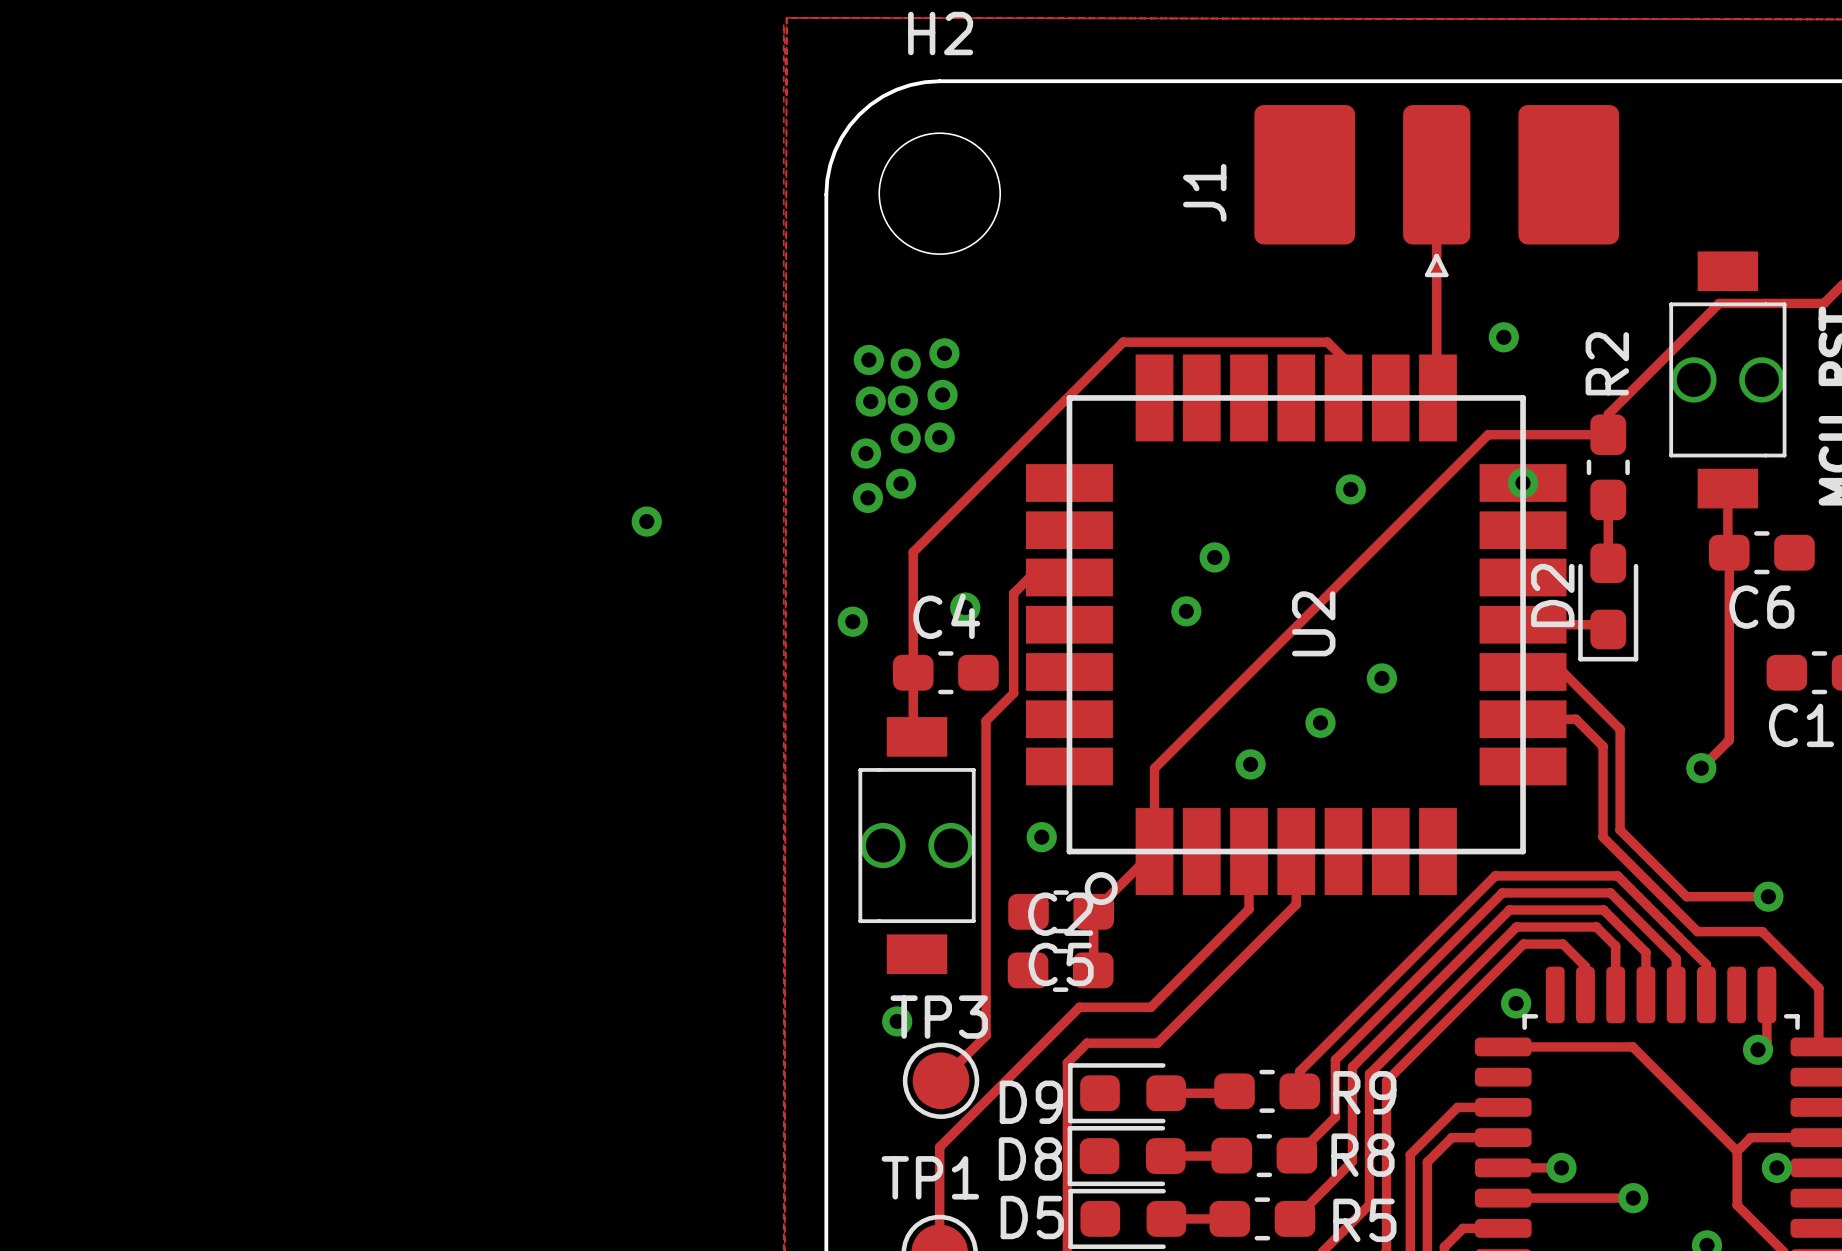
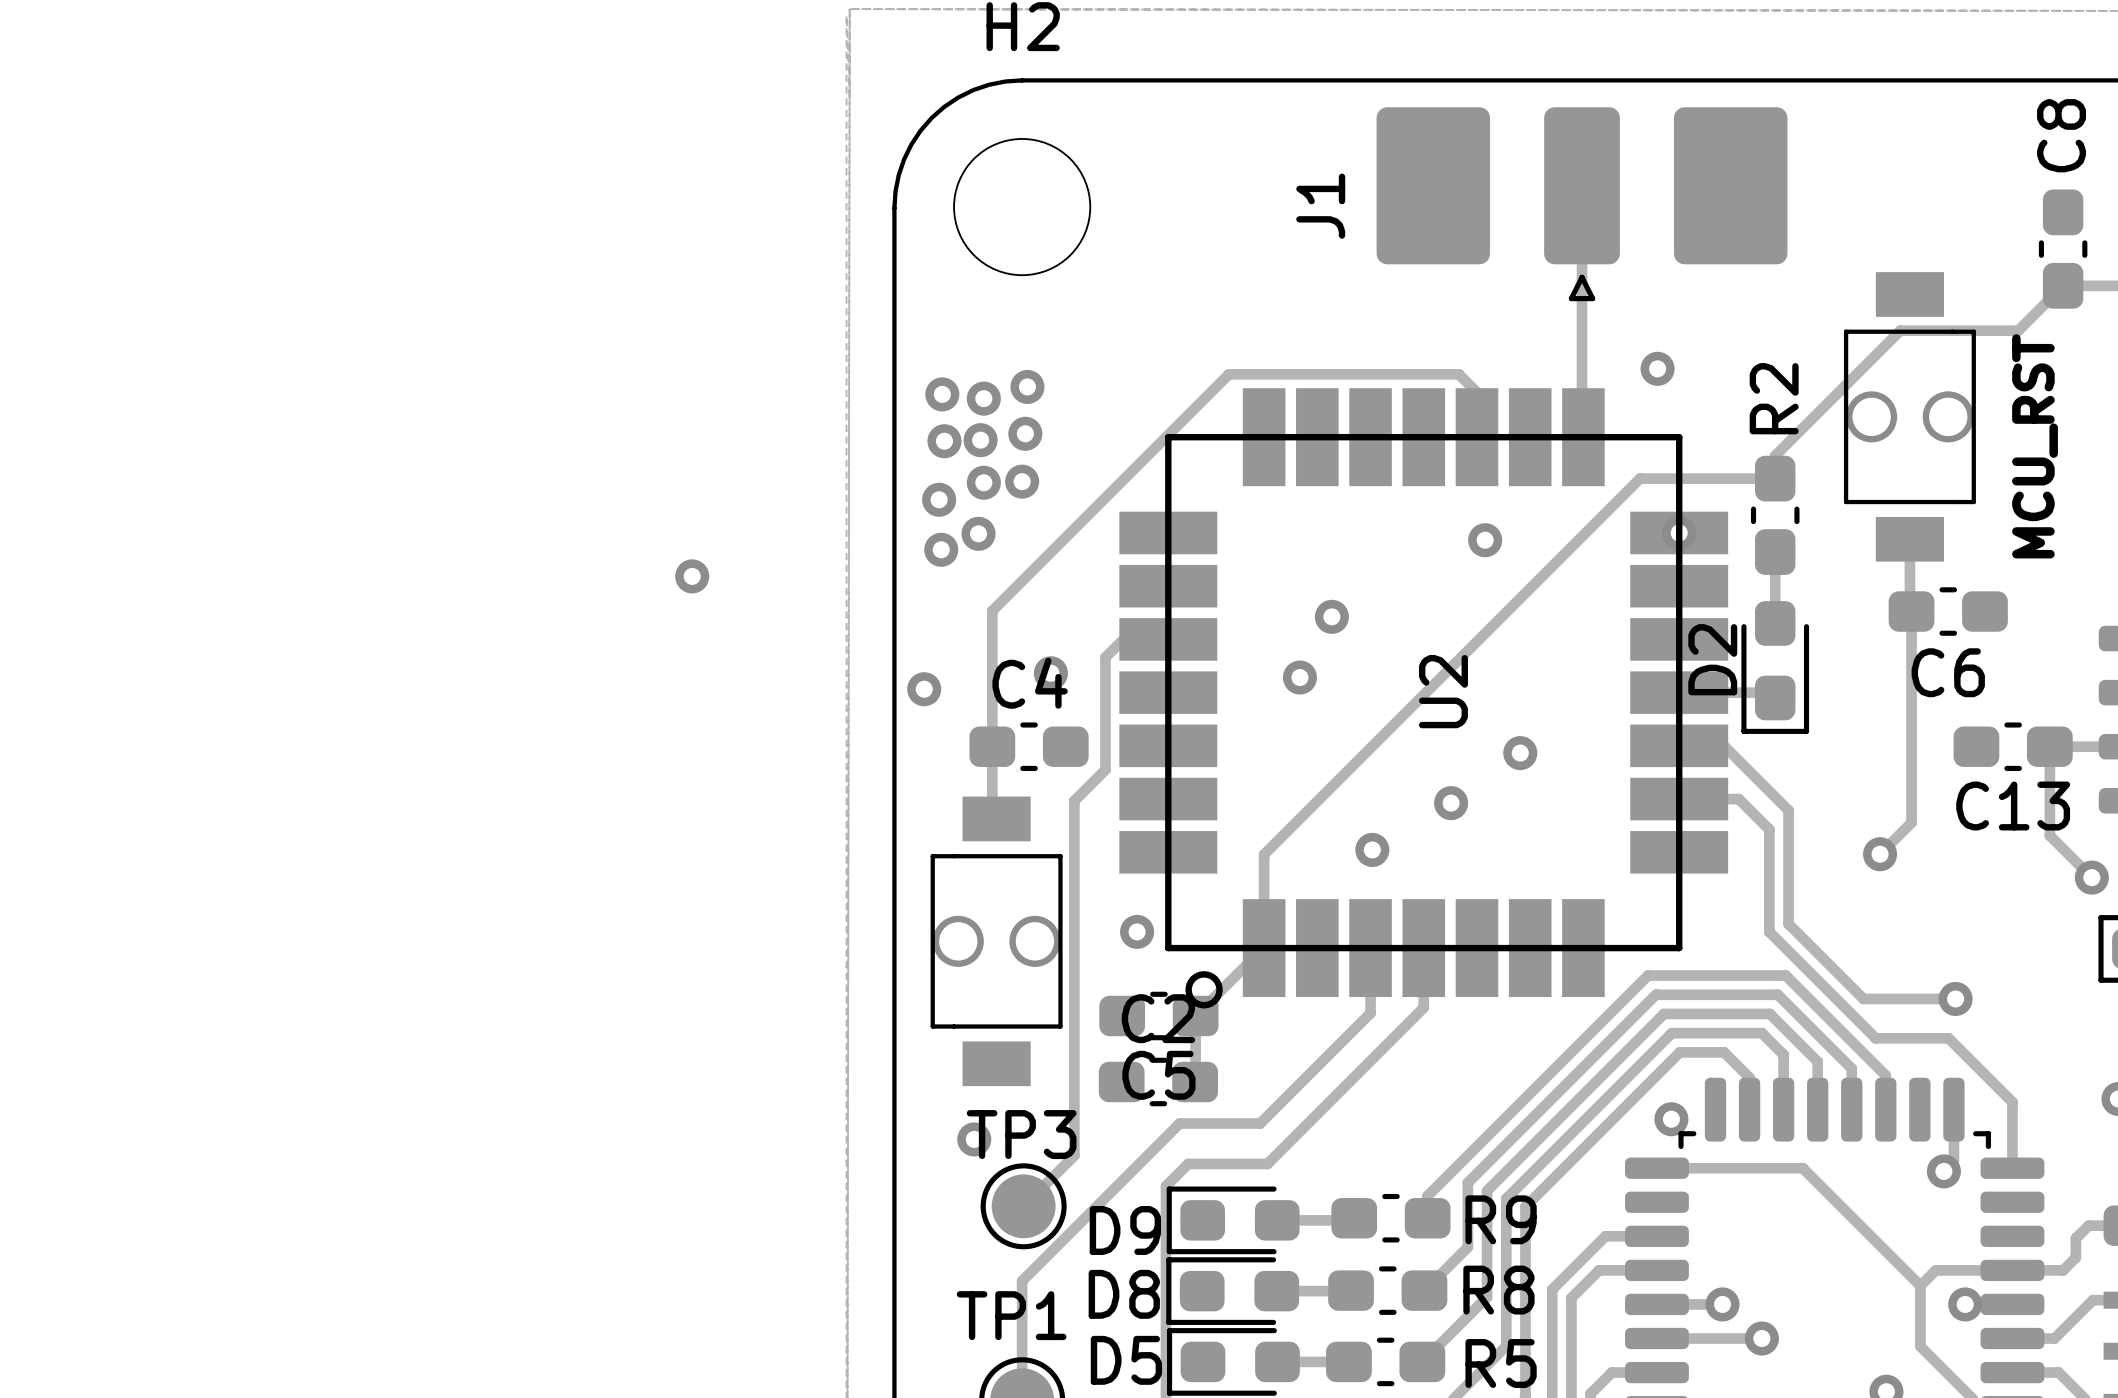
track: (1596, 1198) (1633, 1198) -> none
via position: (1633, 1198) -> (1761, 1338)

